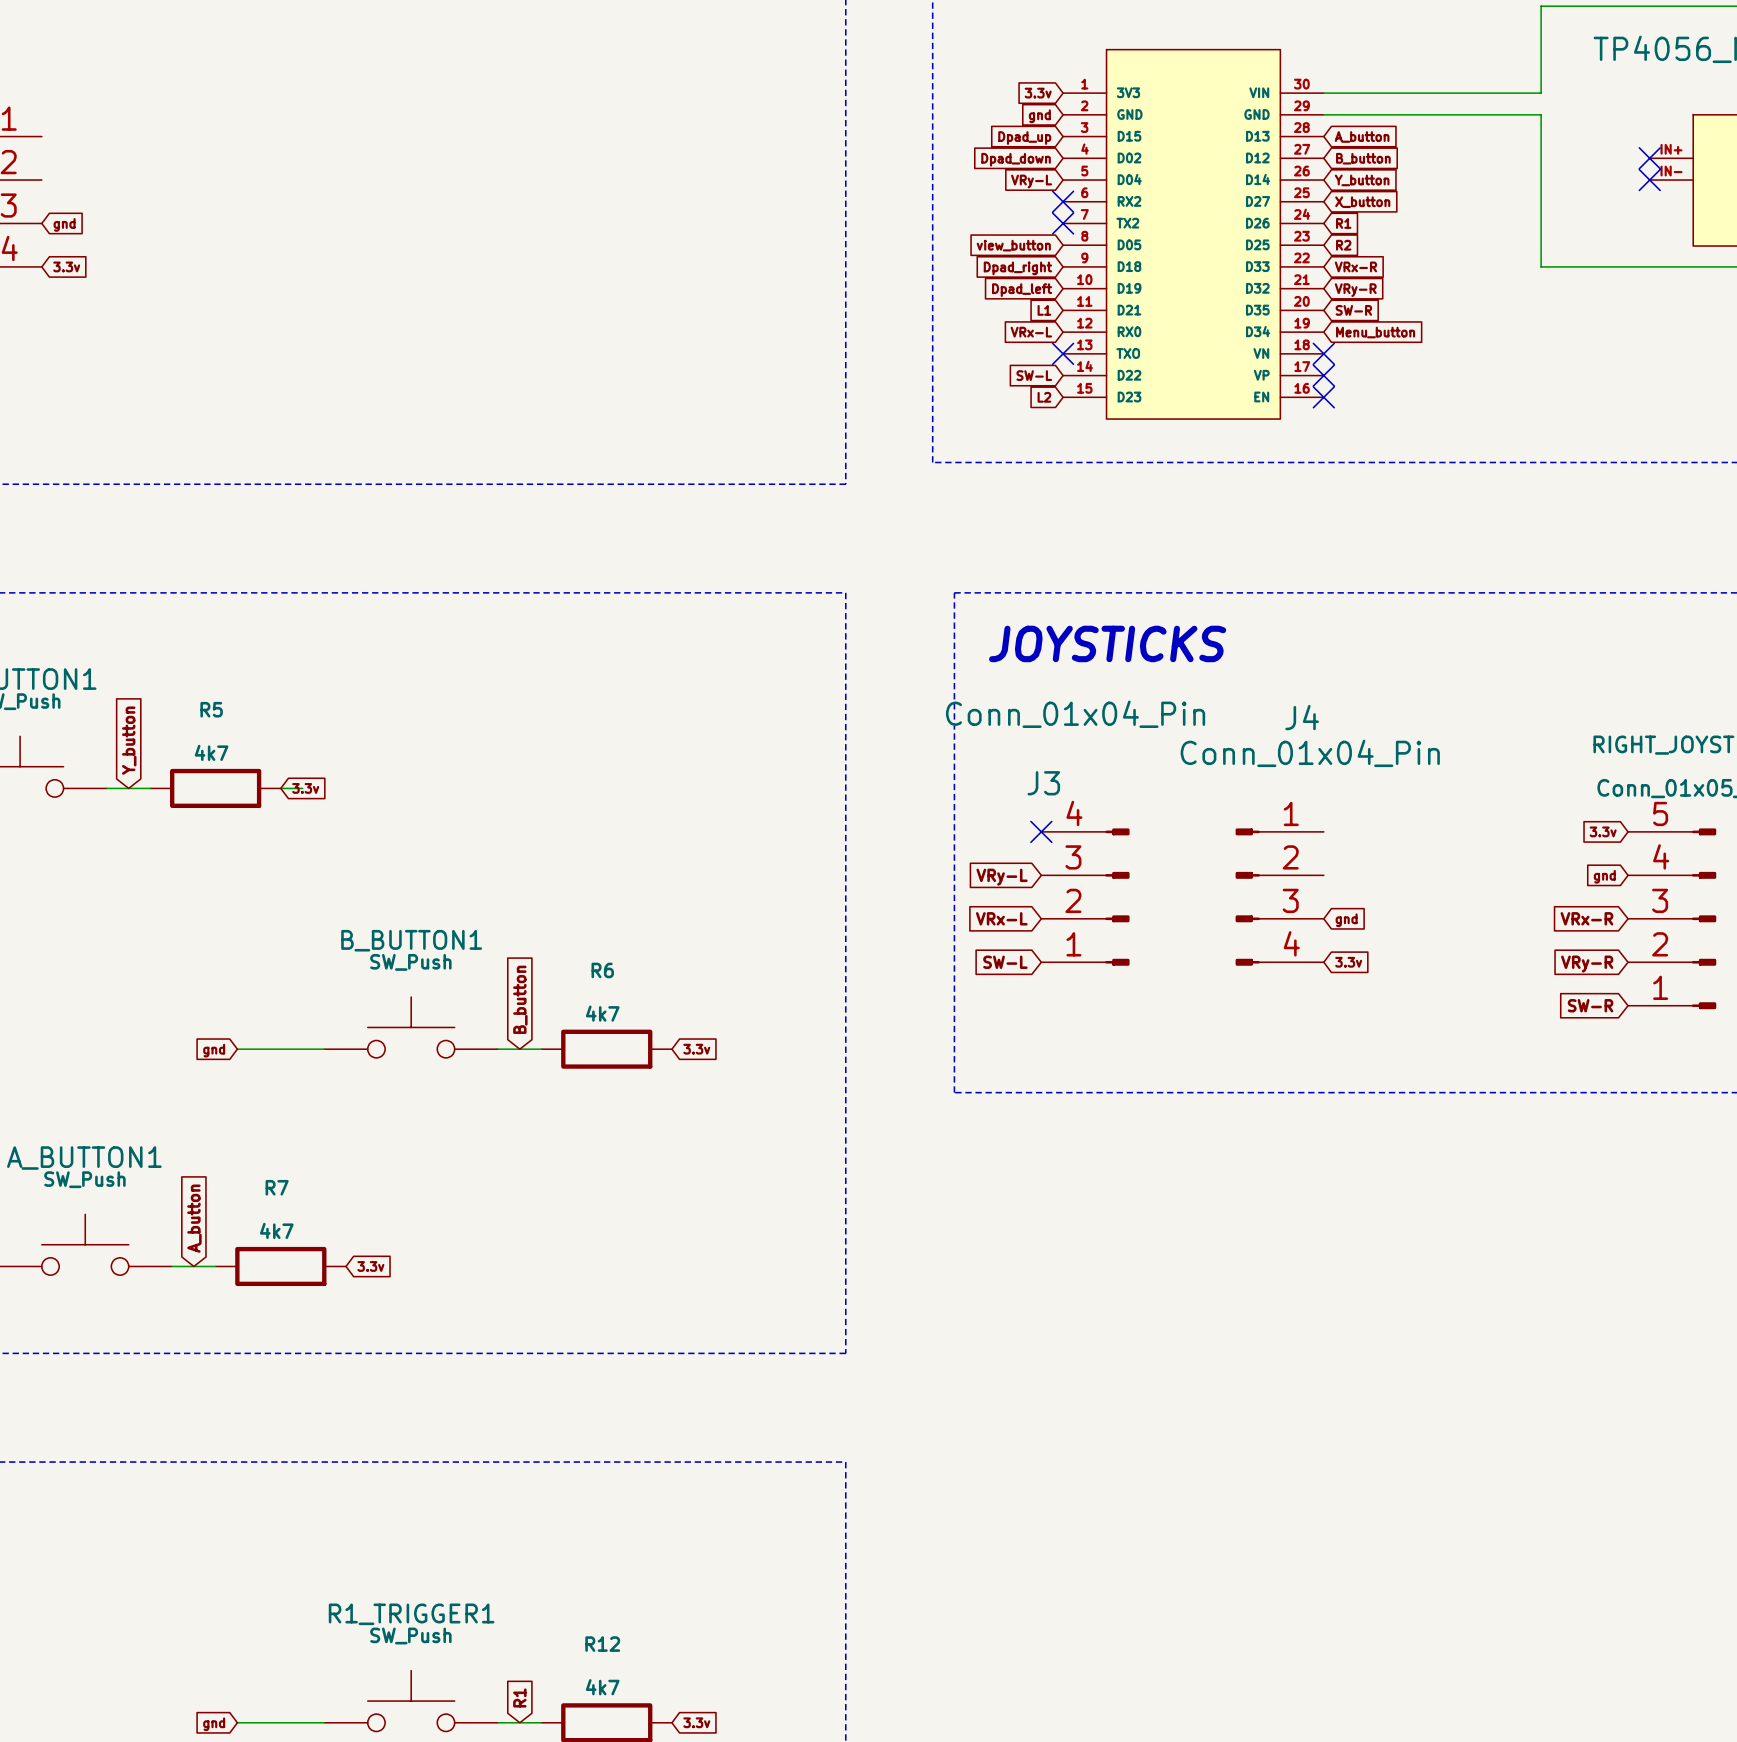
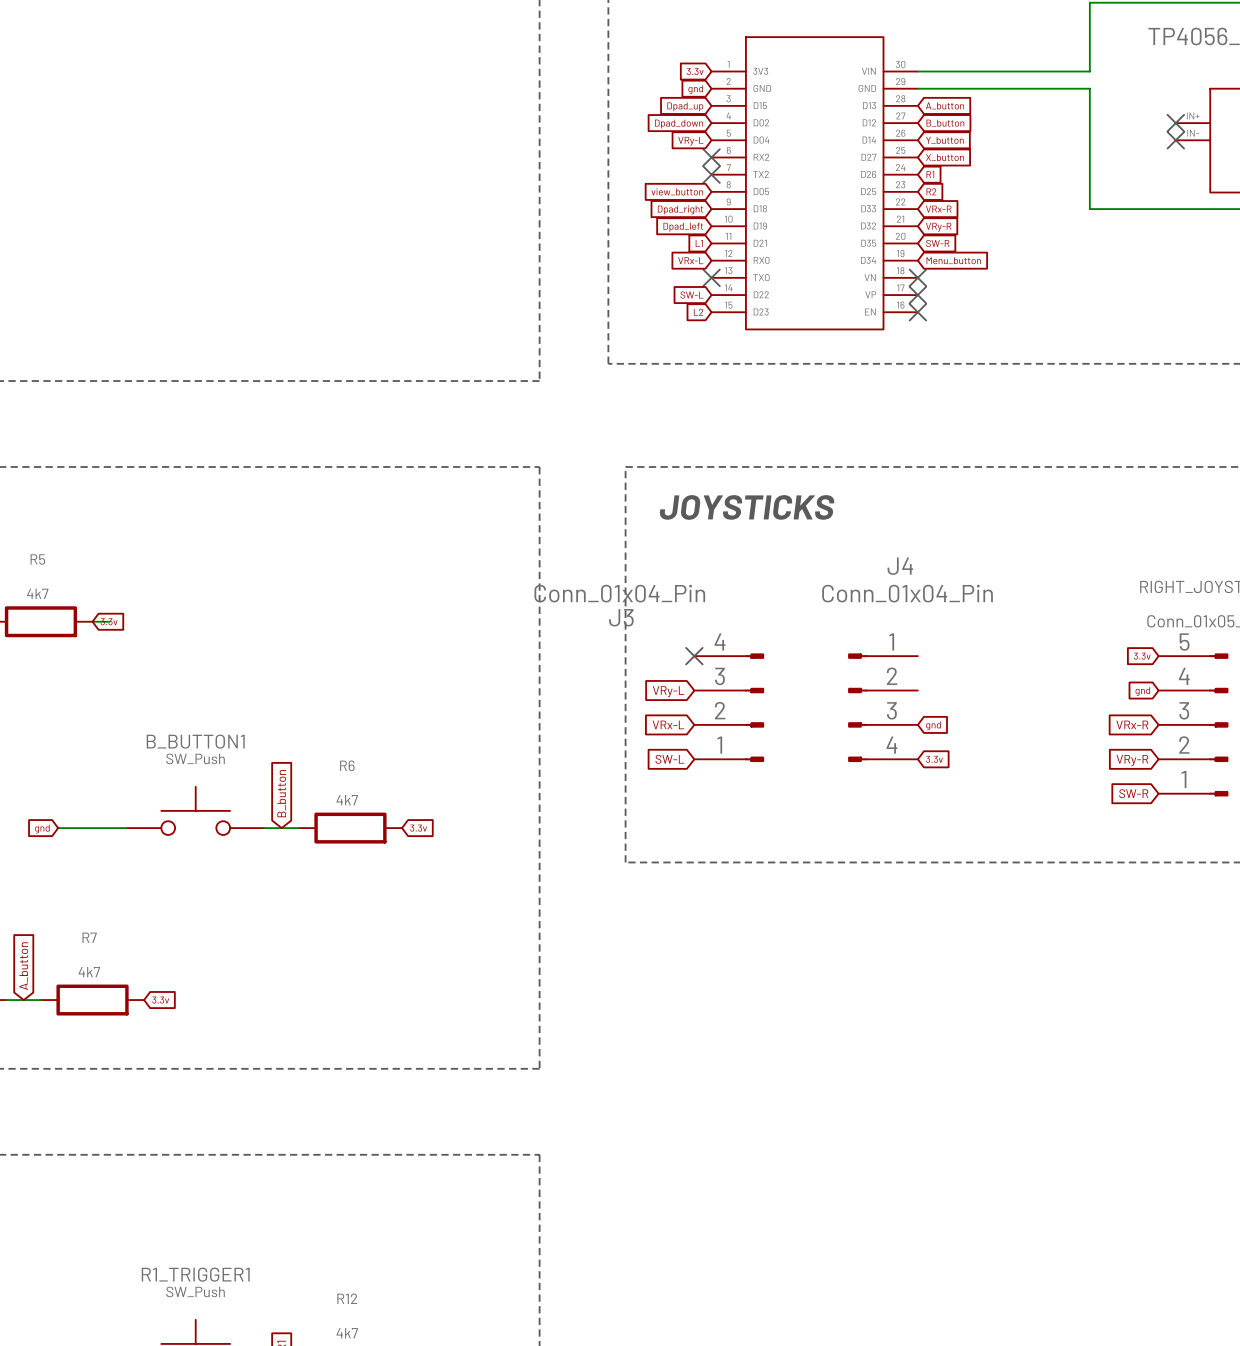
J3 value position: Conn_01x04_Pin (1075, 714) -> Conn_01x04_Pin (619, 593)
J3 name position: J3 (1043, 783) -> J3 (621, 617)

